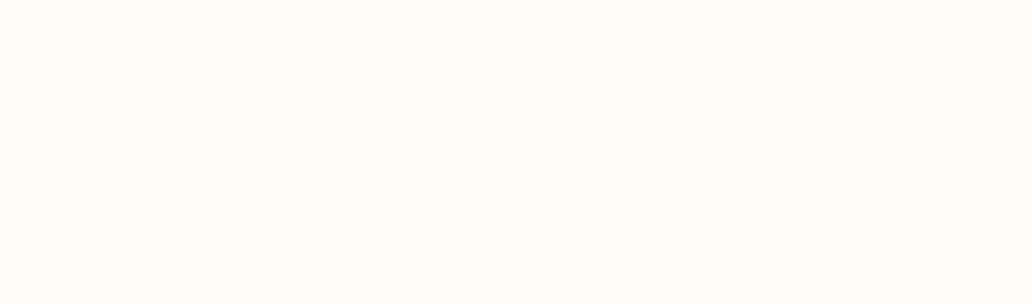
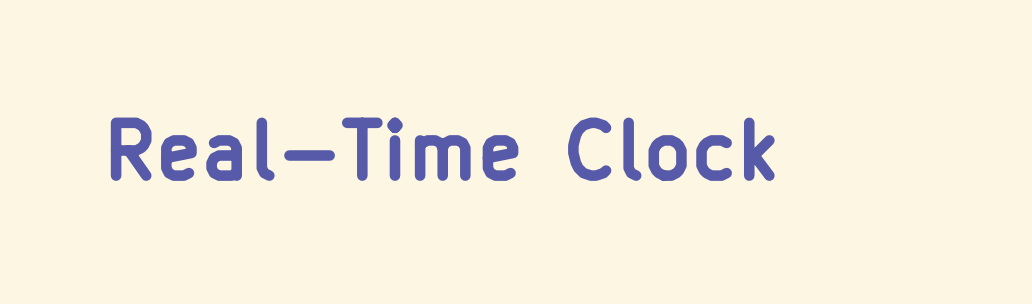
text: none -> Real-Time Clock (442, 149)

